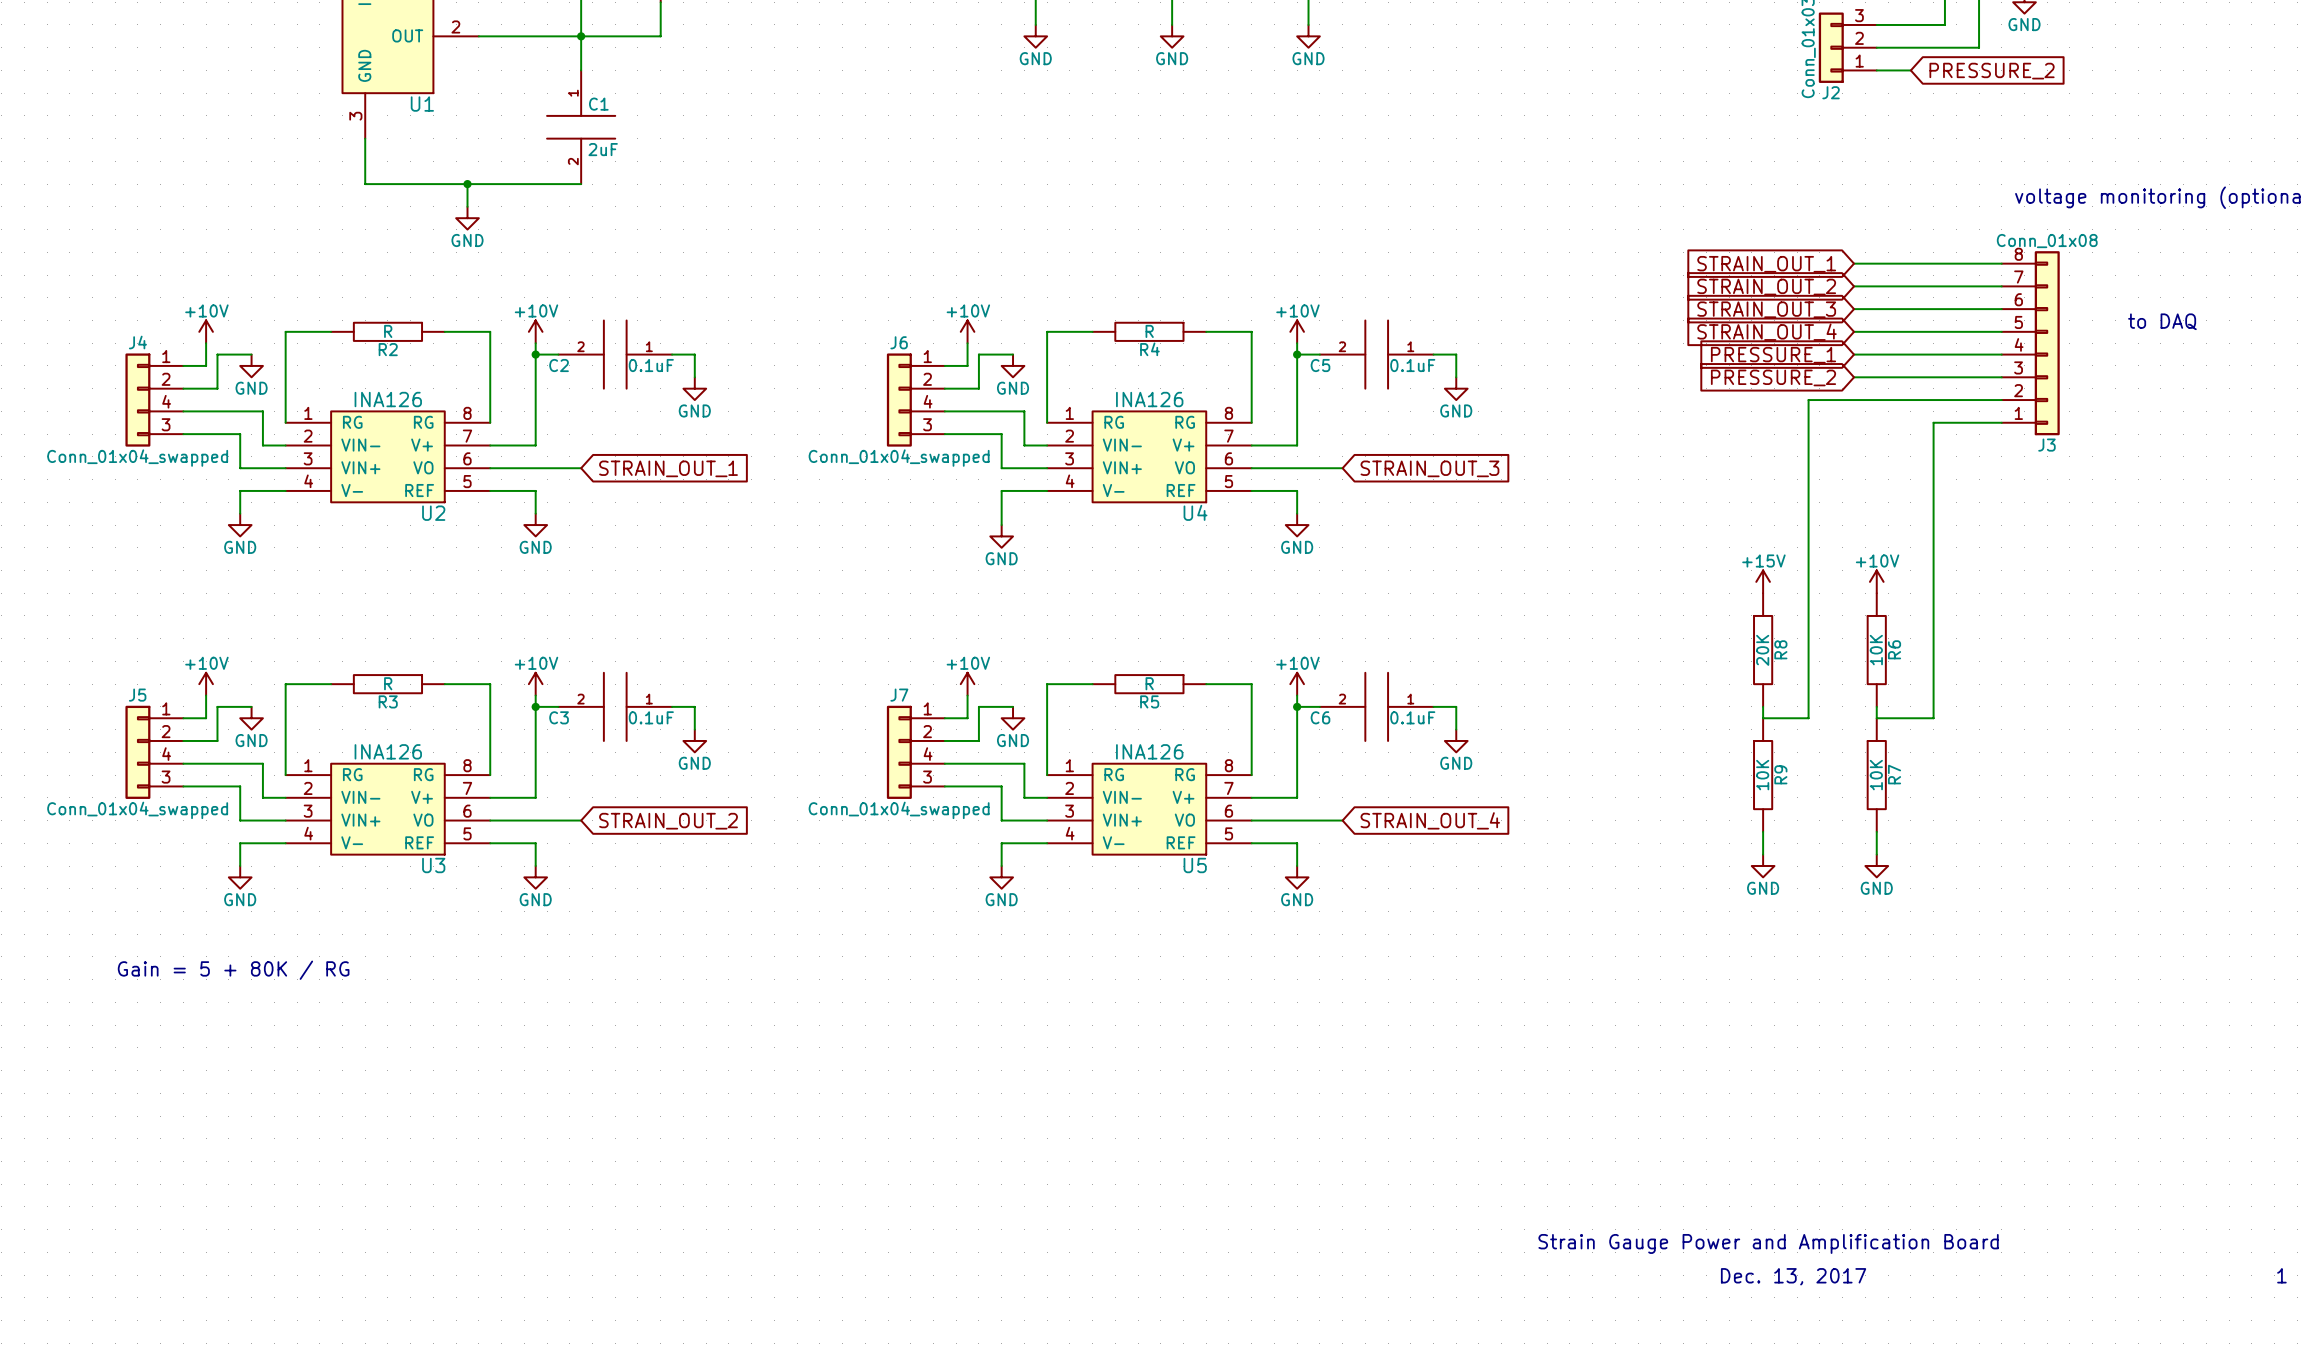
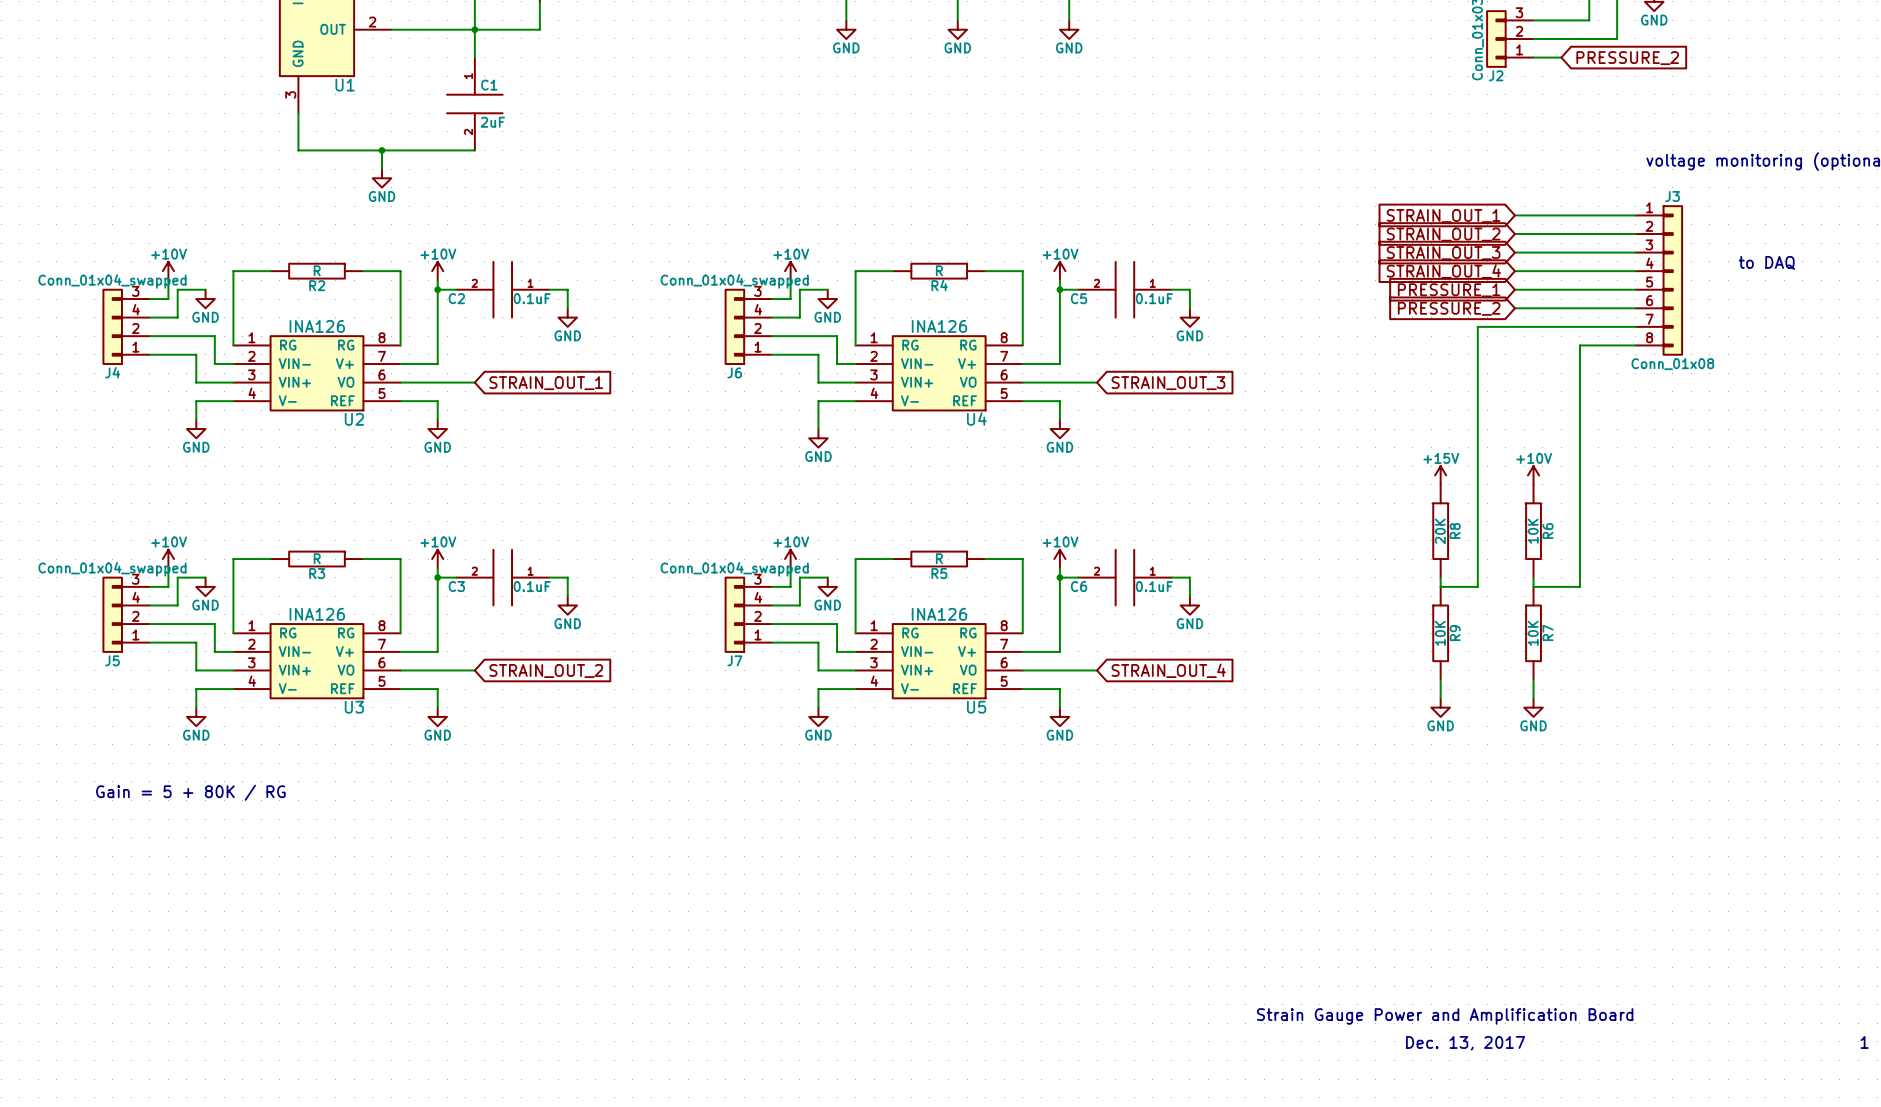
J3 flip: as is (2047, 343) -> up-down (1672, 280)
J4 flip: as is (137, 400) -> up-down (112, 326)
J6 flip: as is (899, 400) -> up-down (734, 326)
J5 flip: as is (137, 752) -> up-down (112, 614)
J7 flip: as is (899, 752) -> up-down (734, 614)

